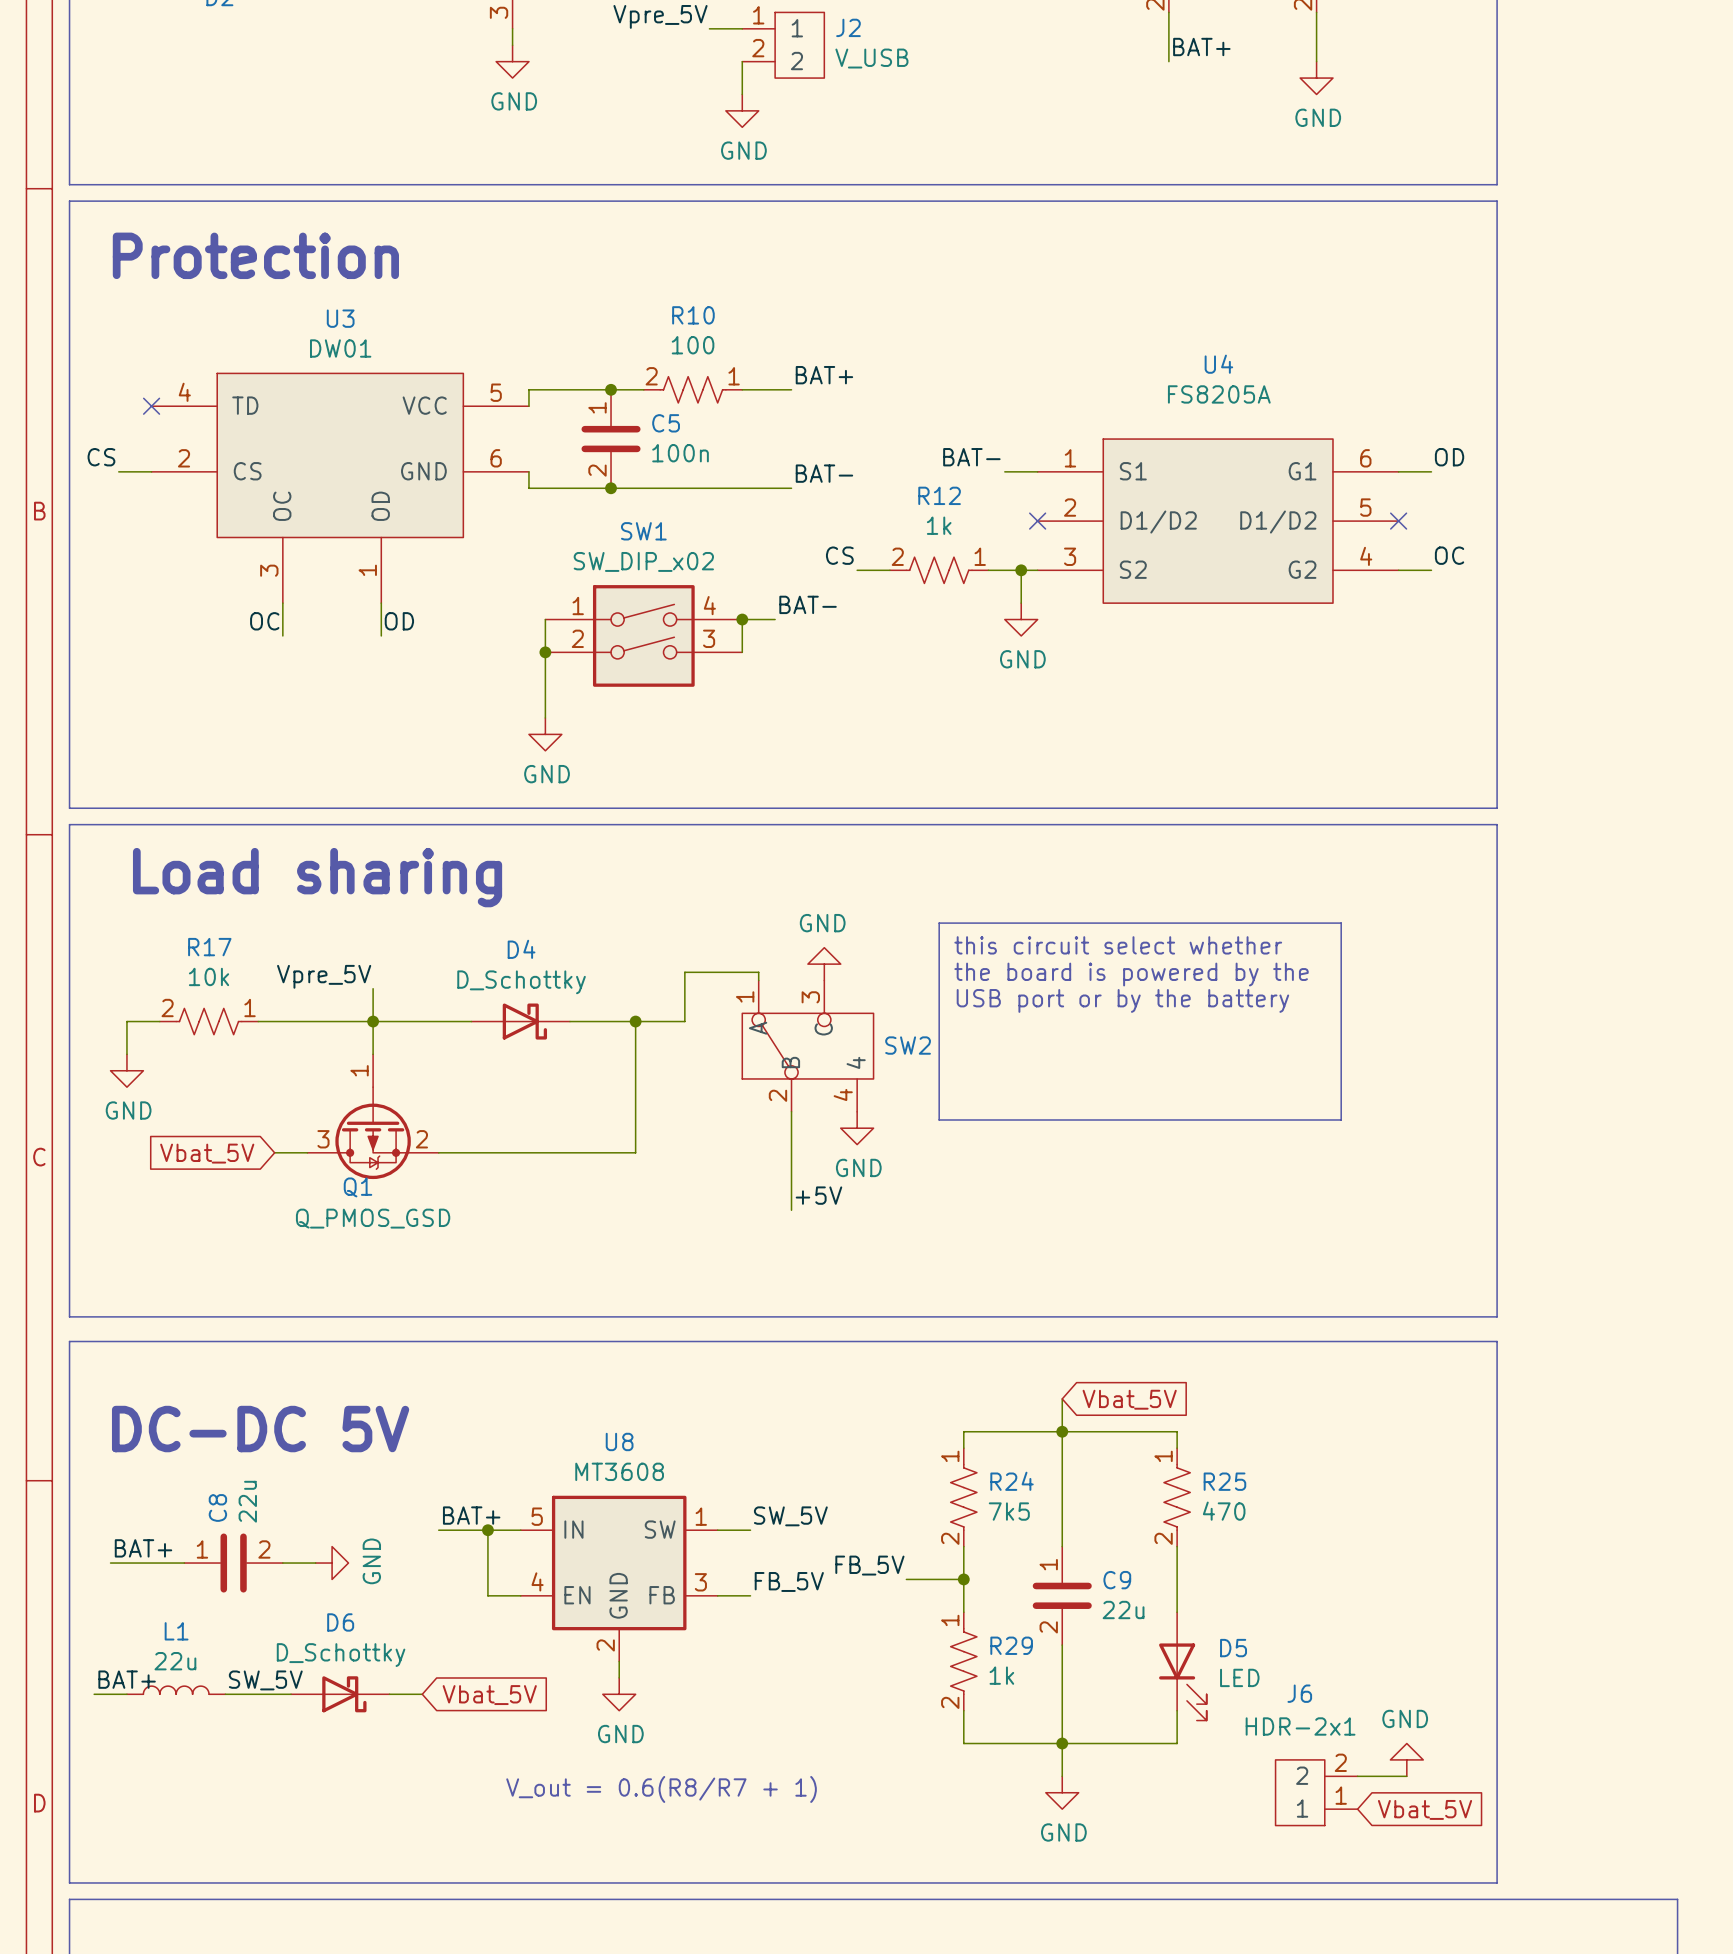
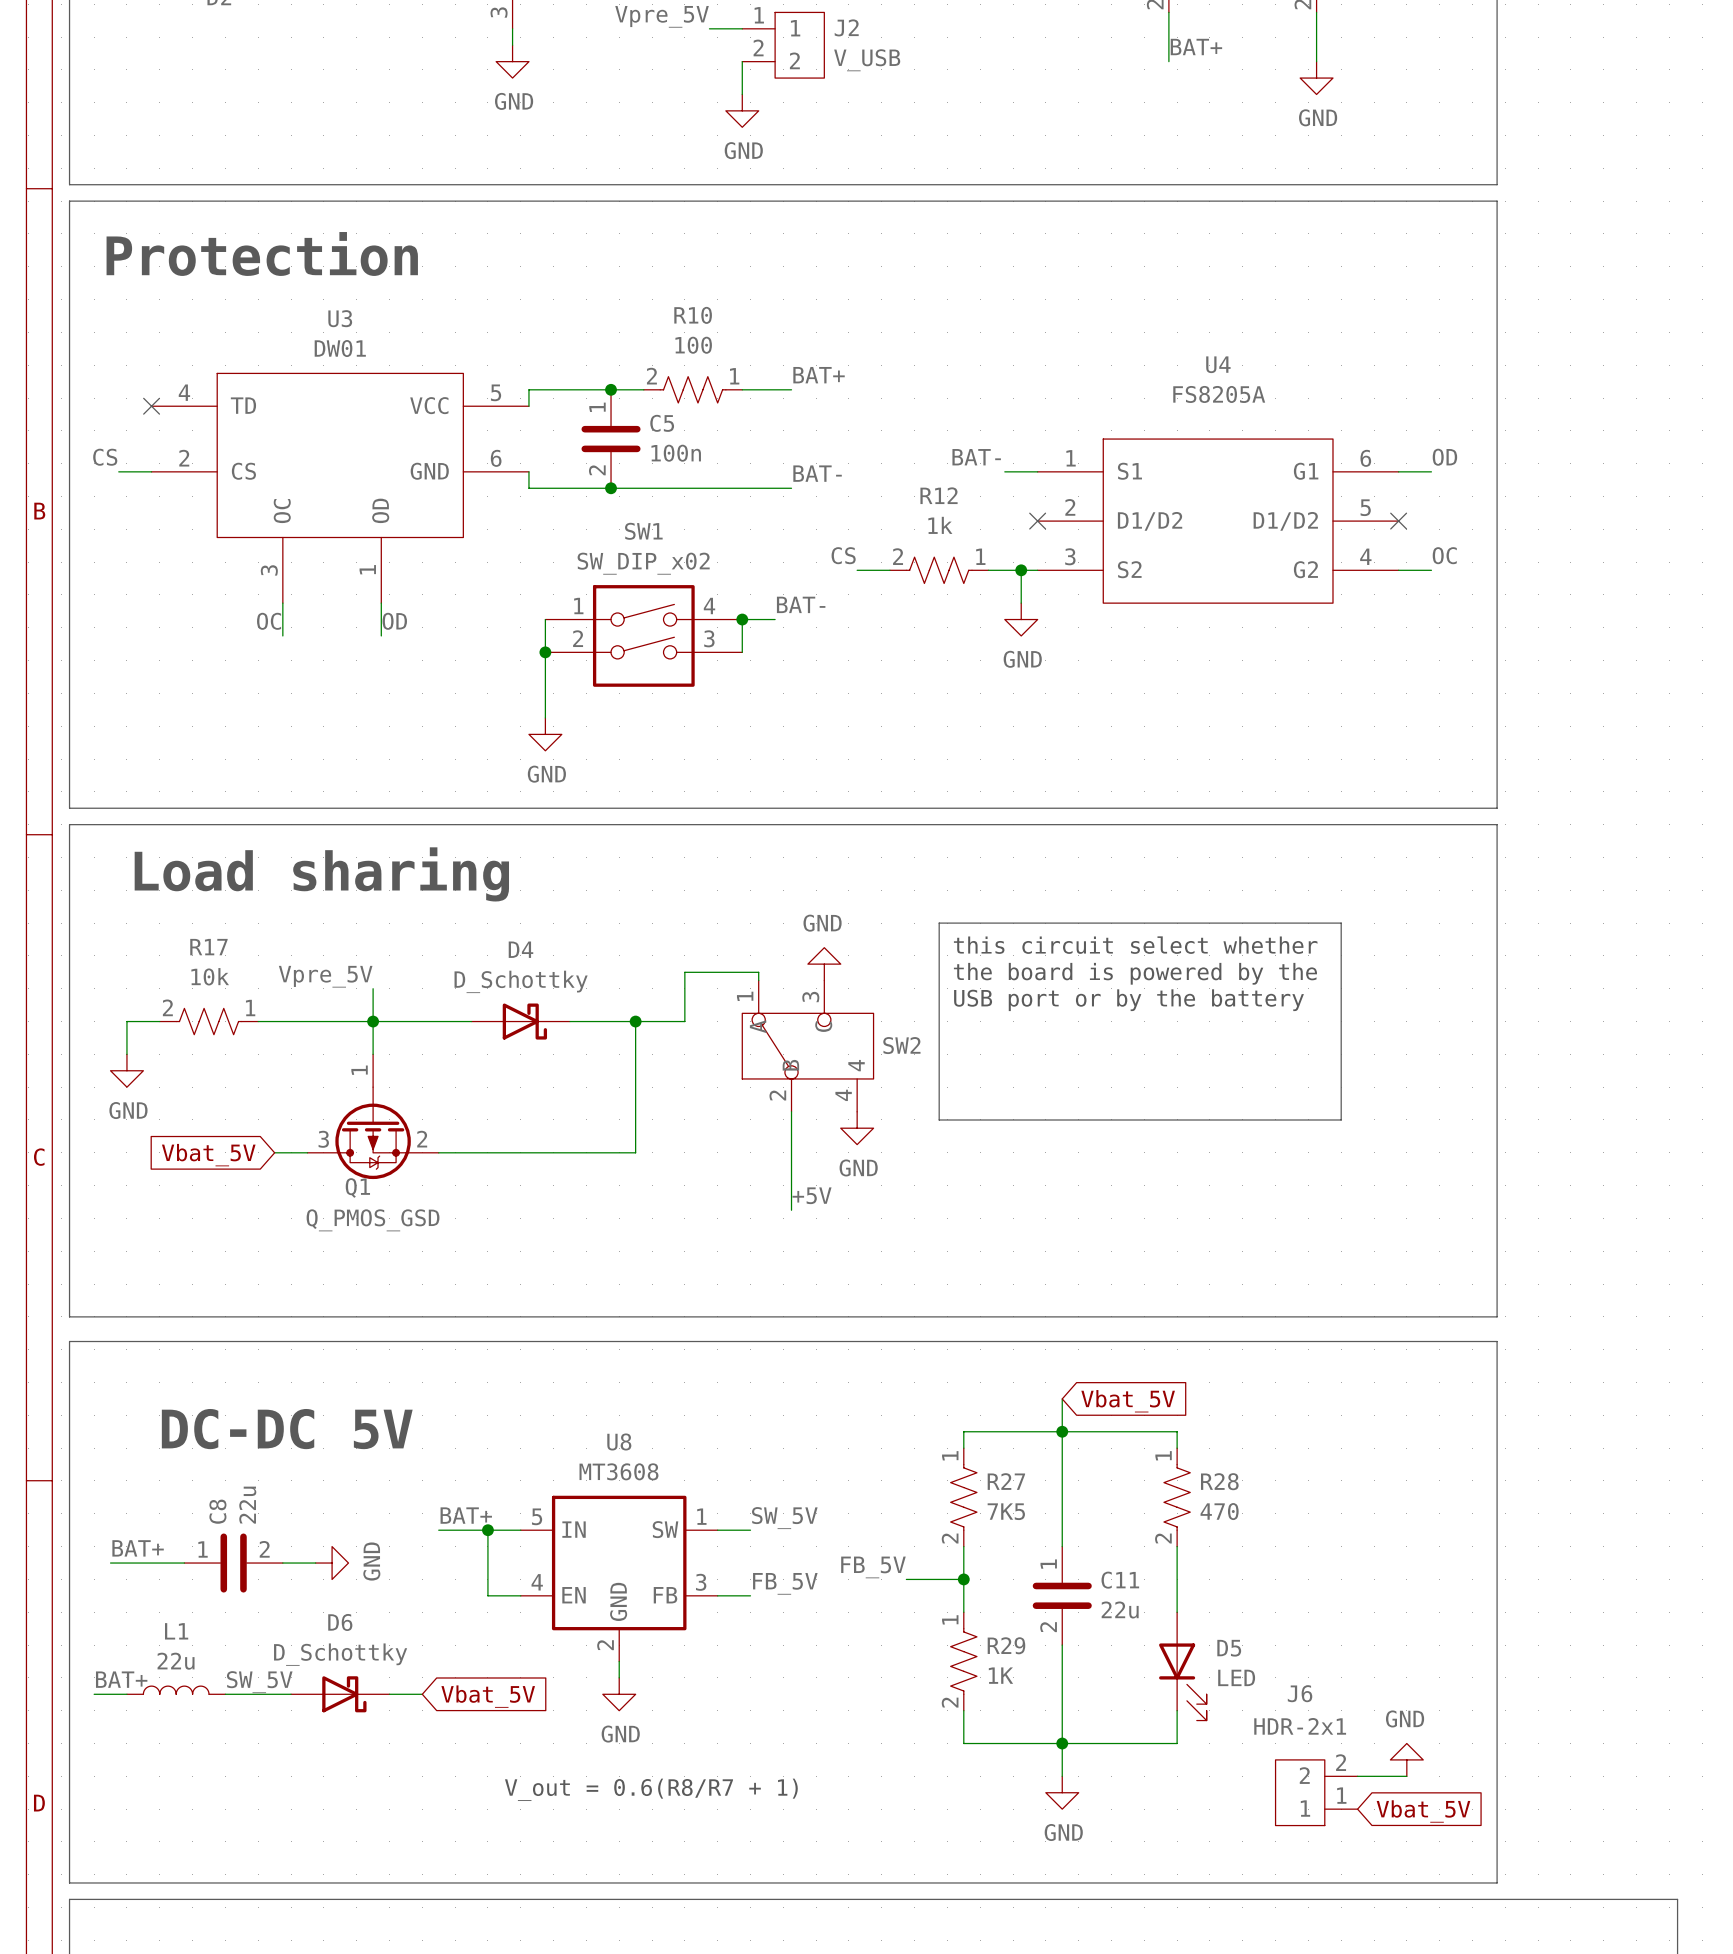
R24 name: R24 (1012, 1481) -> R27 (1006, 1481)
R25 name: R25 (1224, 1481) -> R28 (1219, 1481)
R24 value: 7k5 (1009, 1511) -> 7K5 (1006, 1511)
C9 name: C9 (1117, 1580) -> C11 (1120, 1580)
R29 value: 1k (1001, 1675) -> 1K (1000, 1675)

